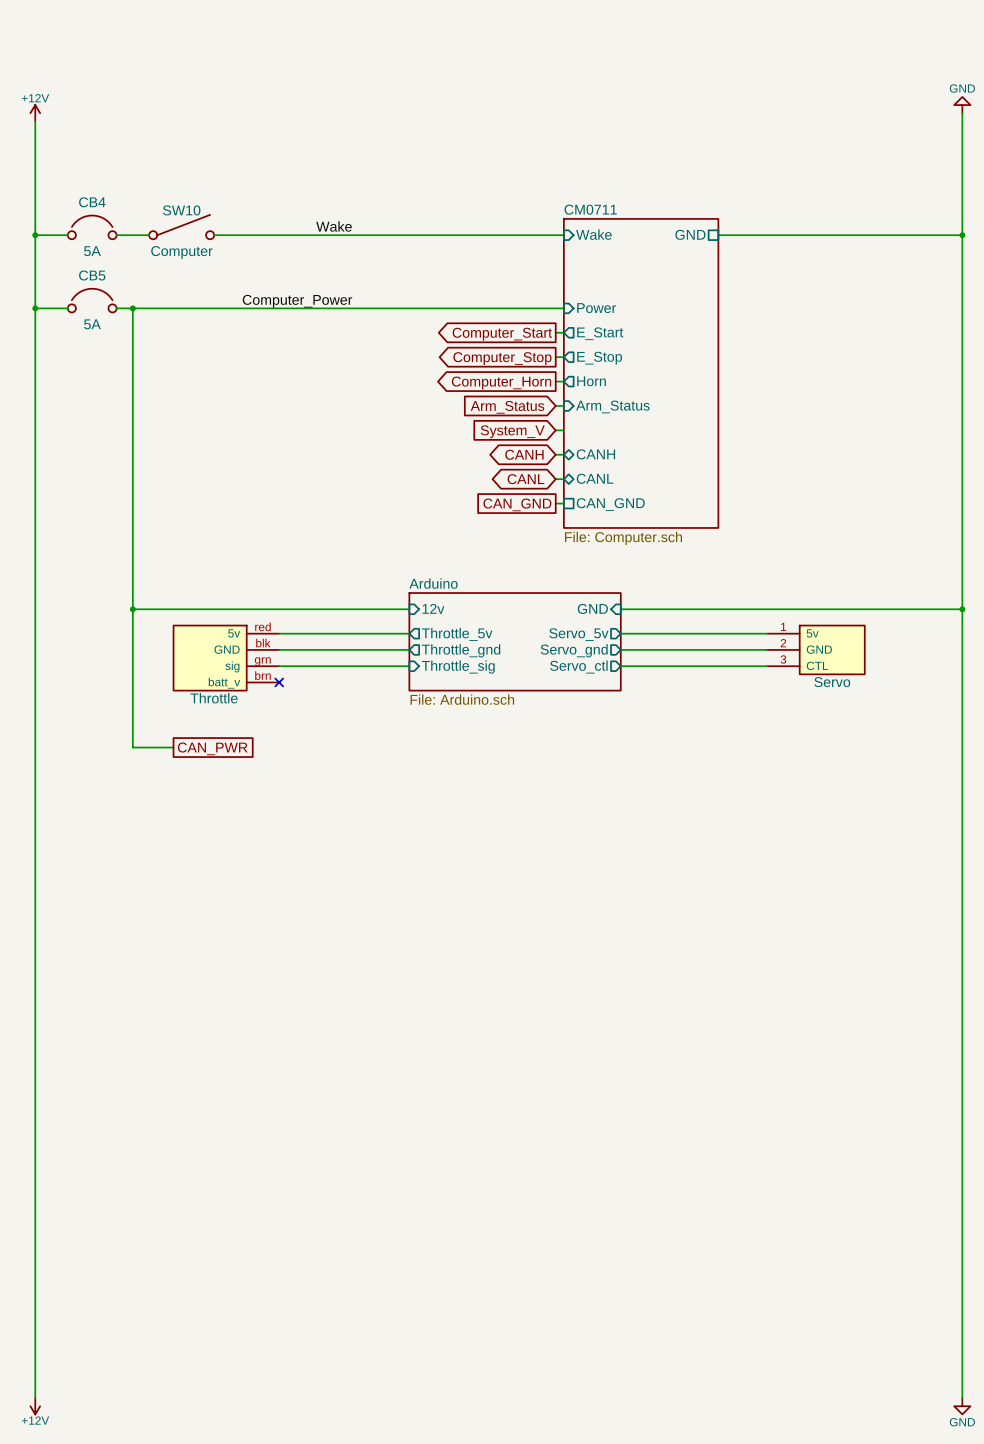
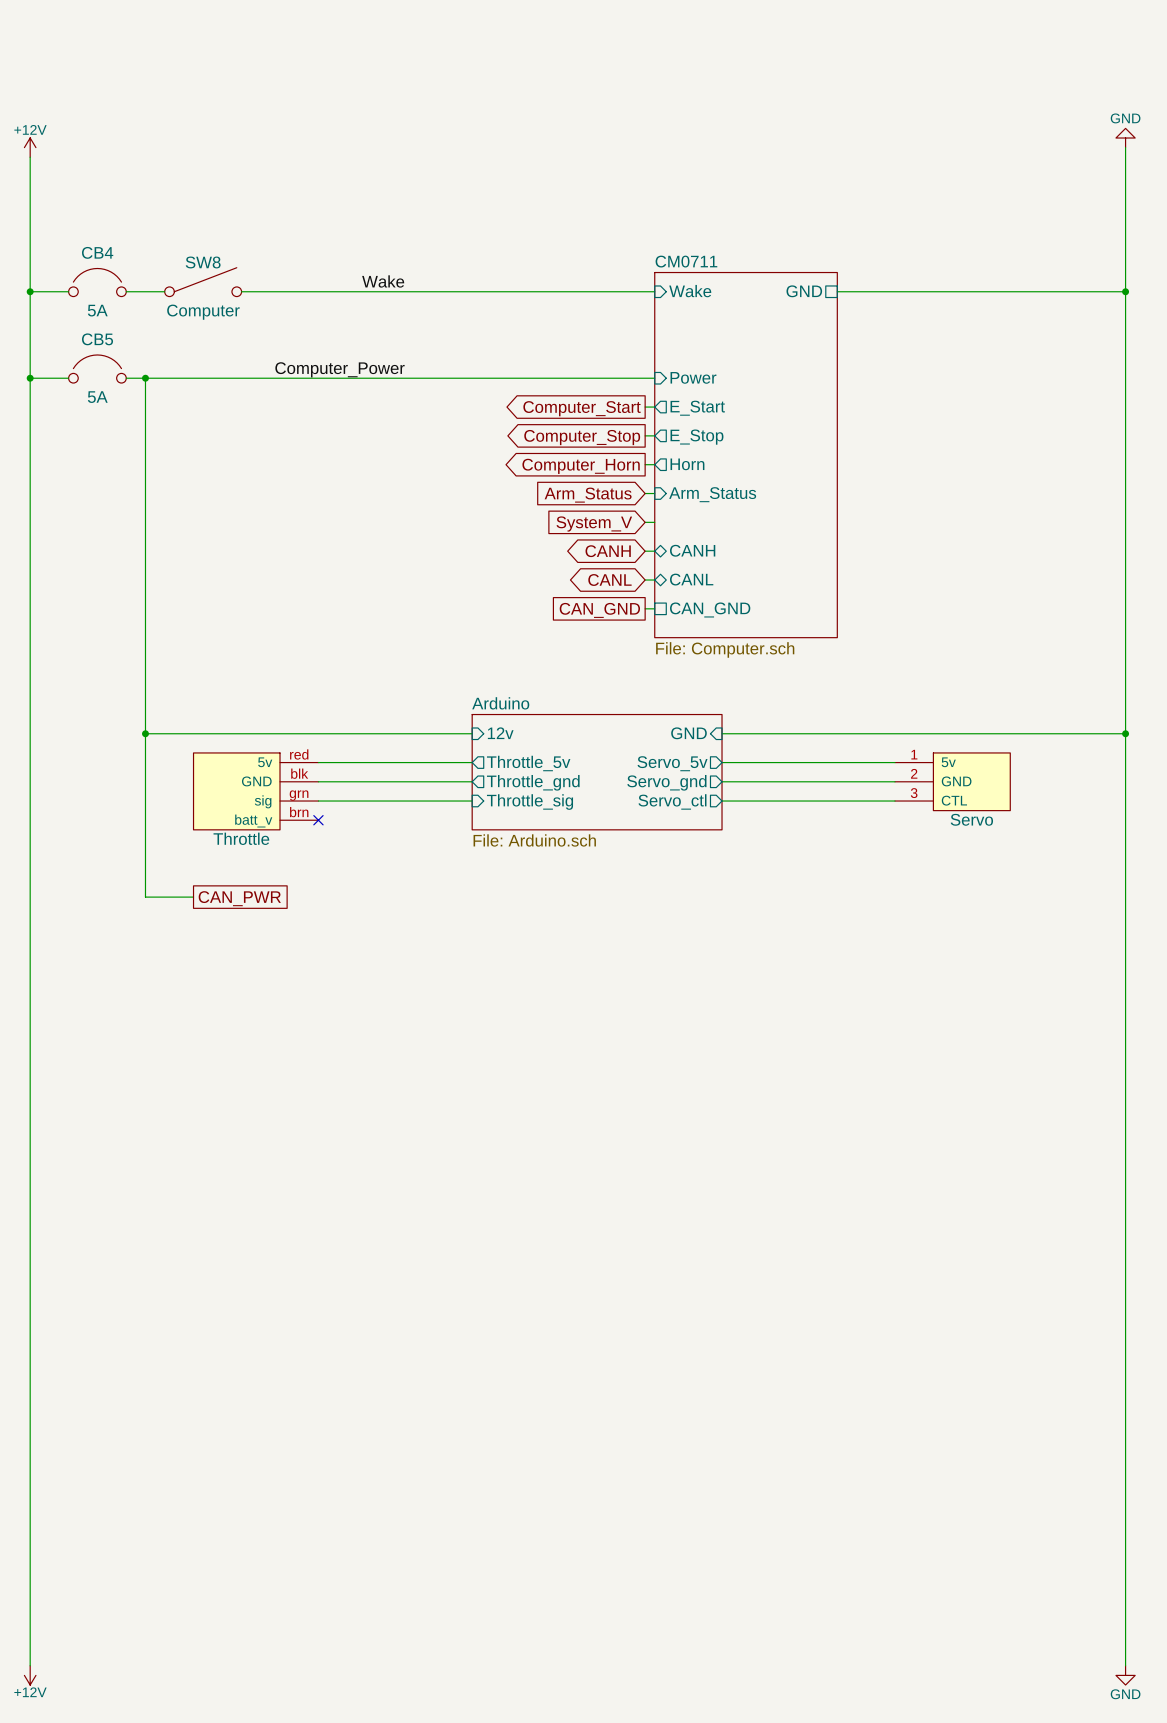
SW10 name: SW10 (181, 210) -> SW8 (203, 262)

